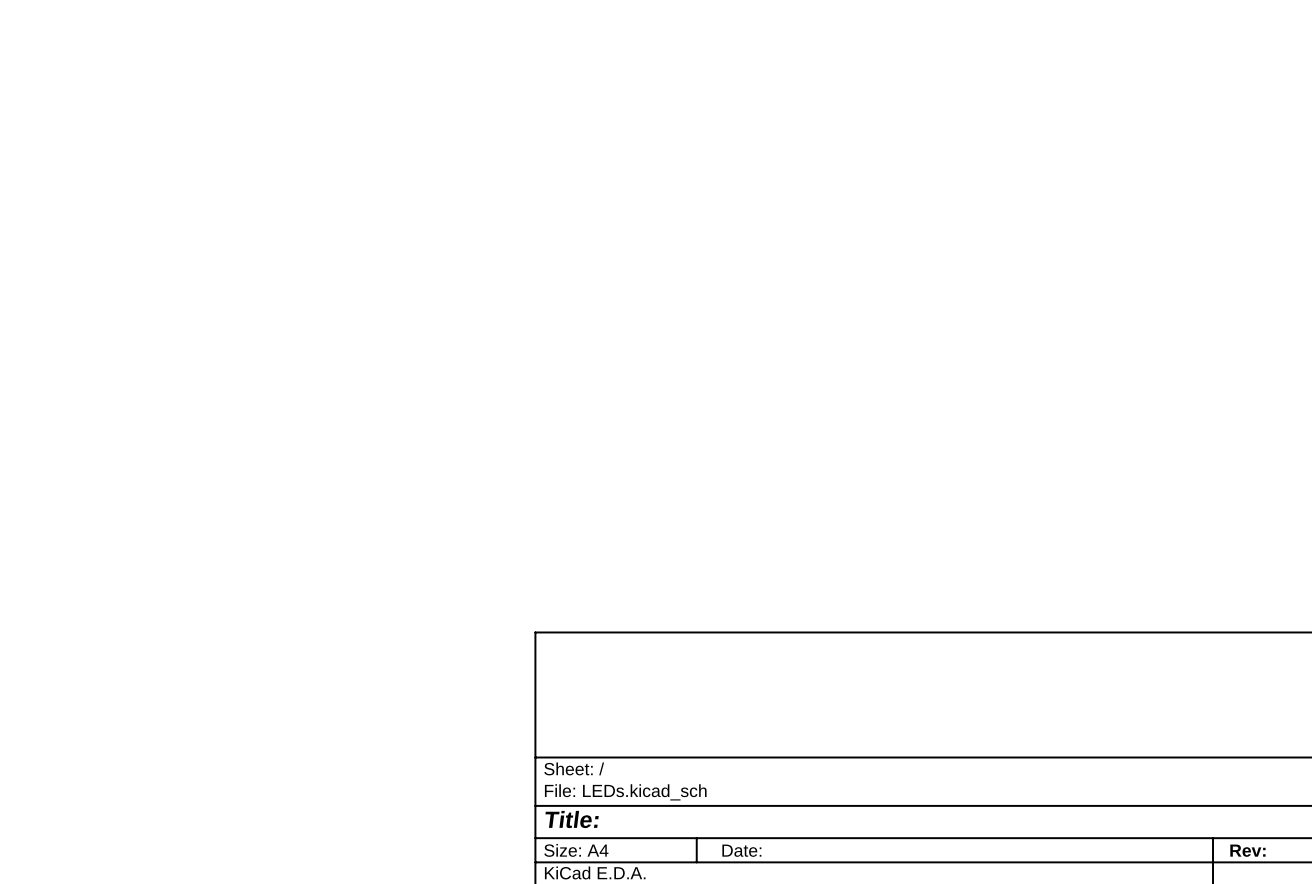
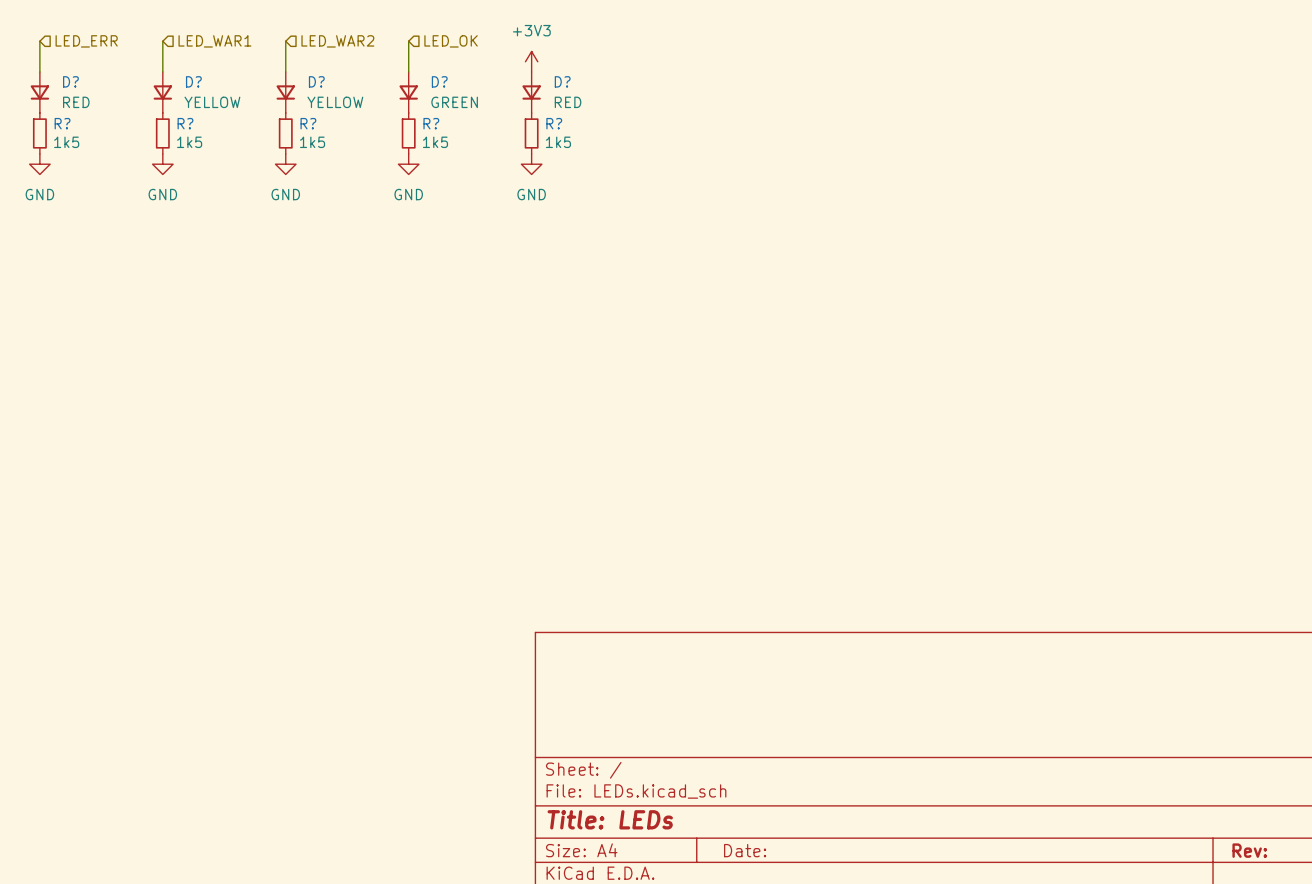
wire: none -> (39, 41) (39, 72)
wire: none -> (162, 41) (162, 72)
wire: none -> (285, 41) (285, 72)
wire: none -> (408, 41) (408, 72)
hierarchical label: none -> LED_ERR (86, 41)
hierarchical label: none -> LED_WAR1 (214, 41)
hierarchical label: none -> LED_WAR2 (337, 41)
hierarchical label: none -> LED_OK (451, 41)
power symbol: none -> +3V3 (531, 61)
D?: none -> RED (39, 92)
D?: none -> YELLOW (162, 92)
D?: none -> YELLOW (285, 92)
D?: none -> GREEN (408, 92)
D?: none -> RED (531, 92)
R?: none -> 1k5 (39, 133)
R?: none -> 1k5 (162, 133)
R?: none -> 1k5 (285, 133)
R?: none -> 1k5 (408, 133)
R?: none -> 1k5 (531, 133)
power symbol: none -> GND (39, 164)
power symbol: none -> GND (162, 164)
power symbol: none -> GND (285, 164)
power symbol: none -> GND (408, 164)
power symbol: none -> GND (531, 164)
title block: Title: (572, 819) -> Title: LEDs (610, 819)

